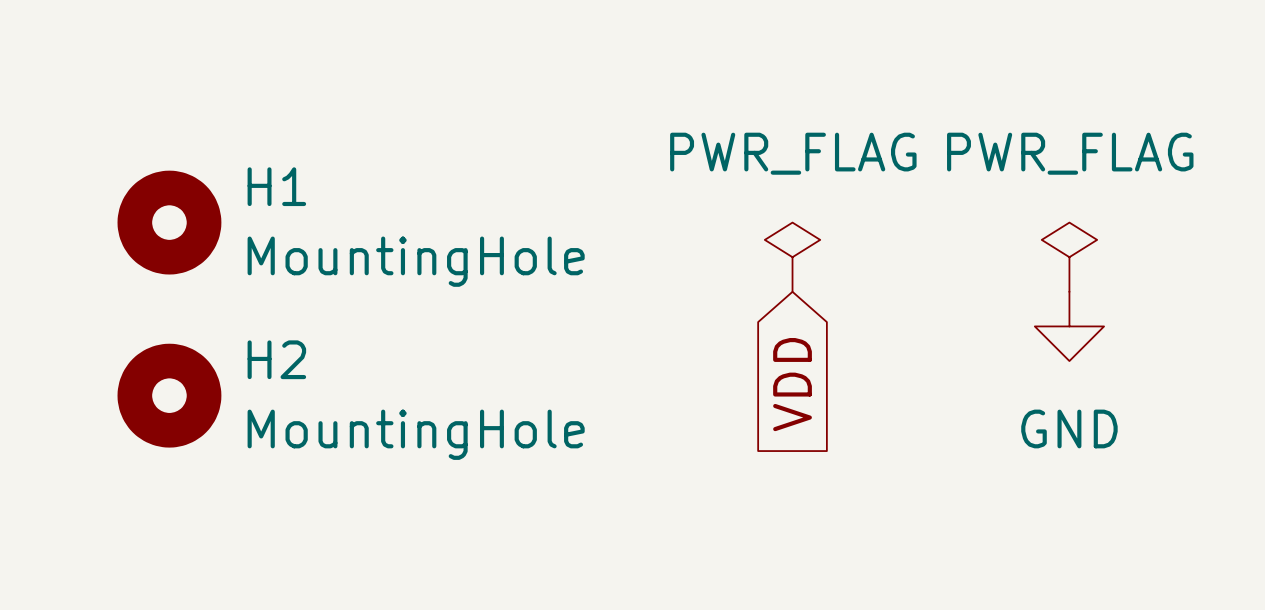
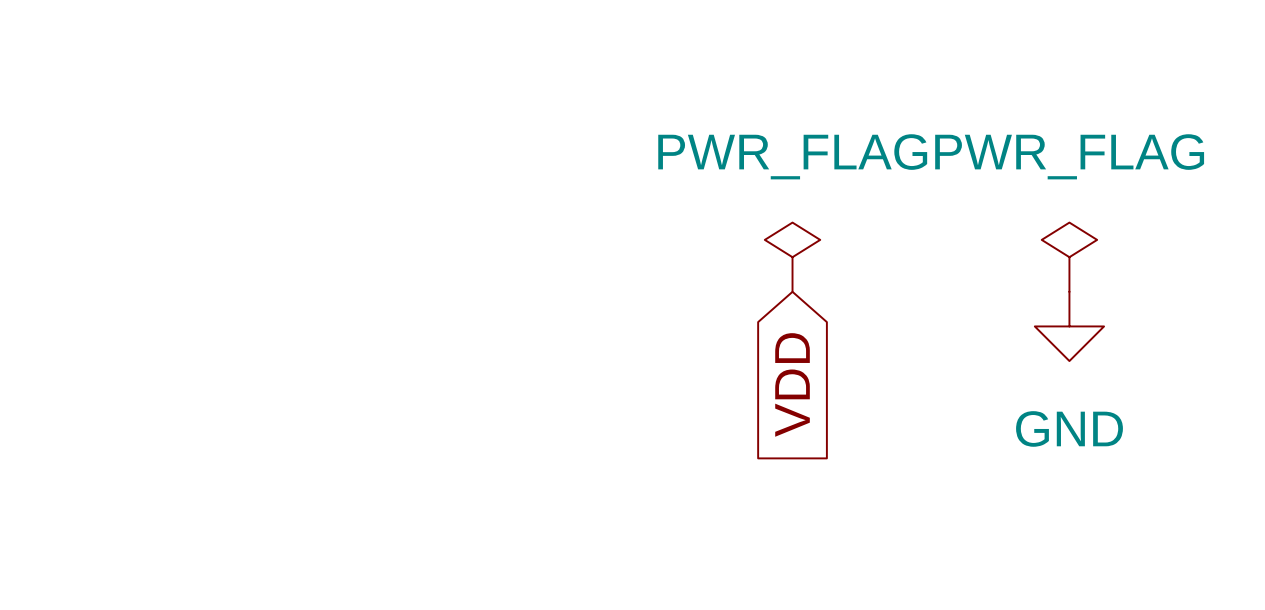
H1: MountingHole (169, 222) -> none
H2: MountingHole (169, 395) -> none

